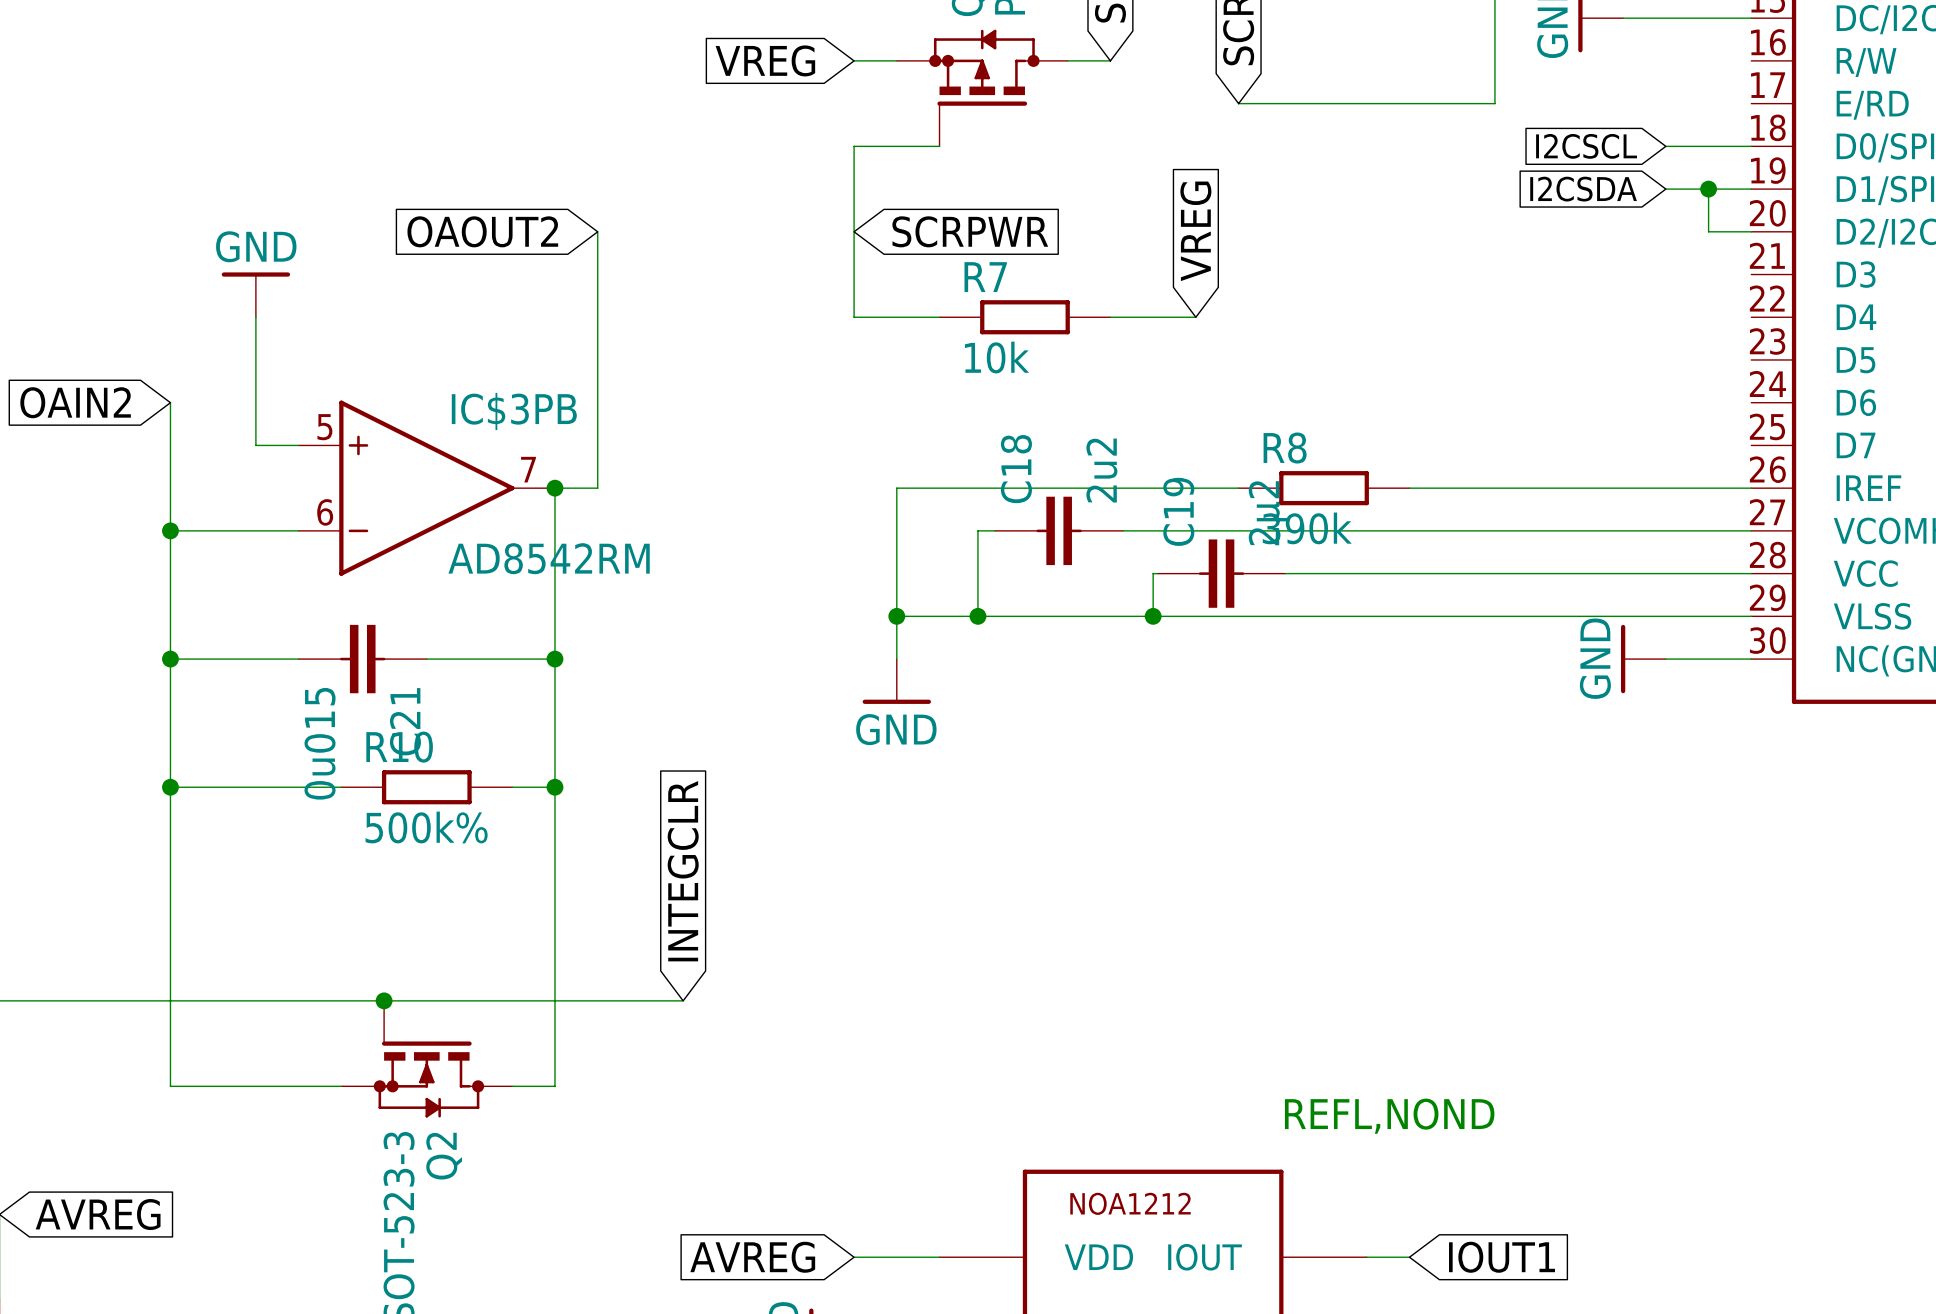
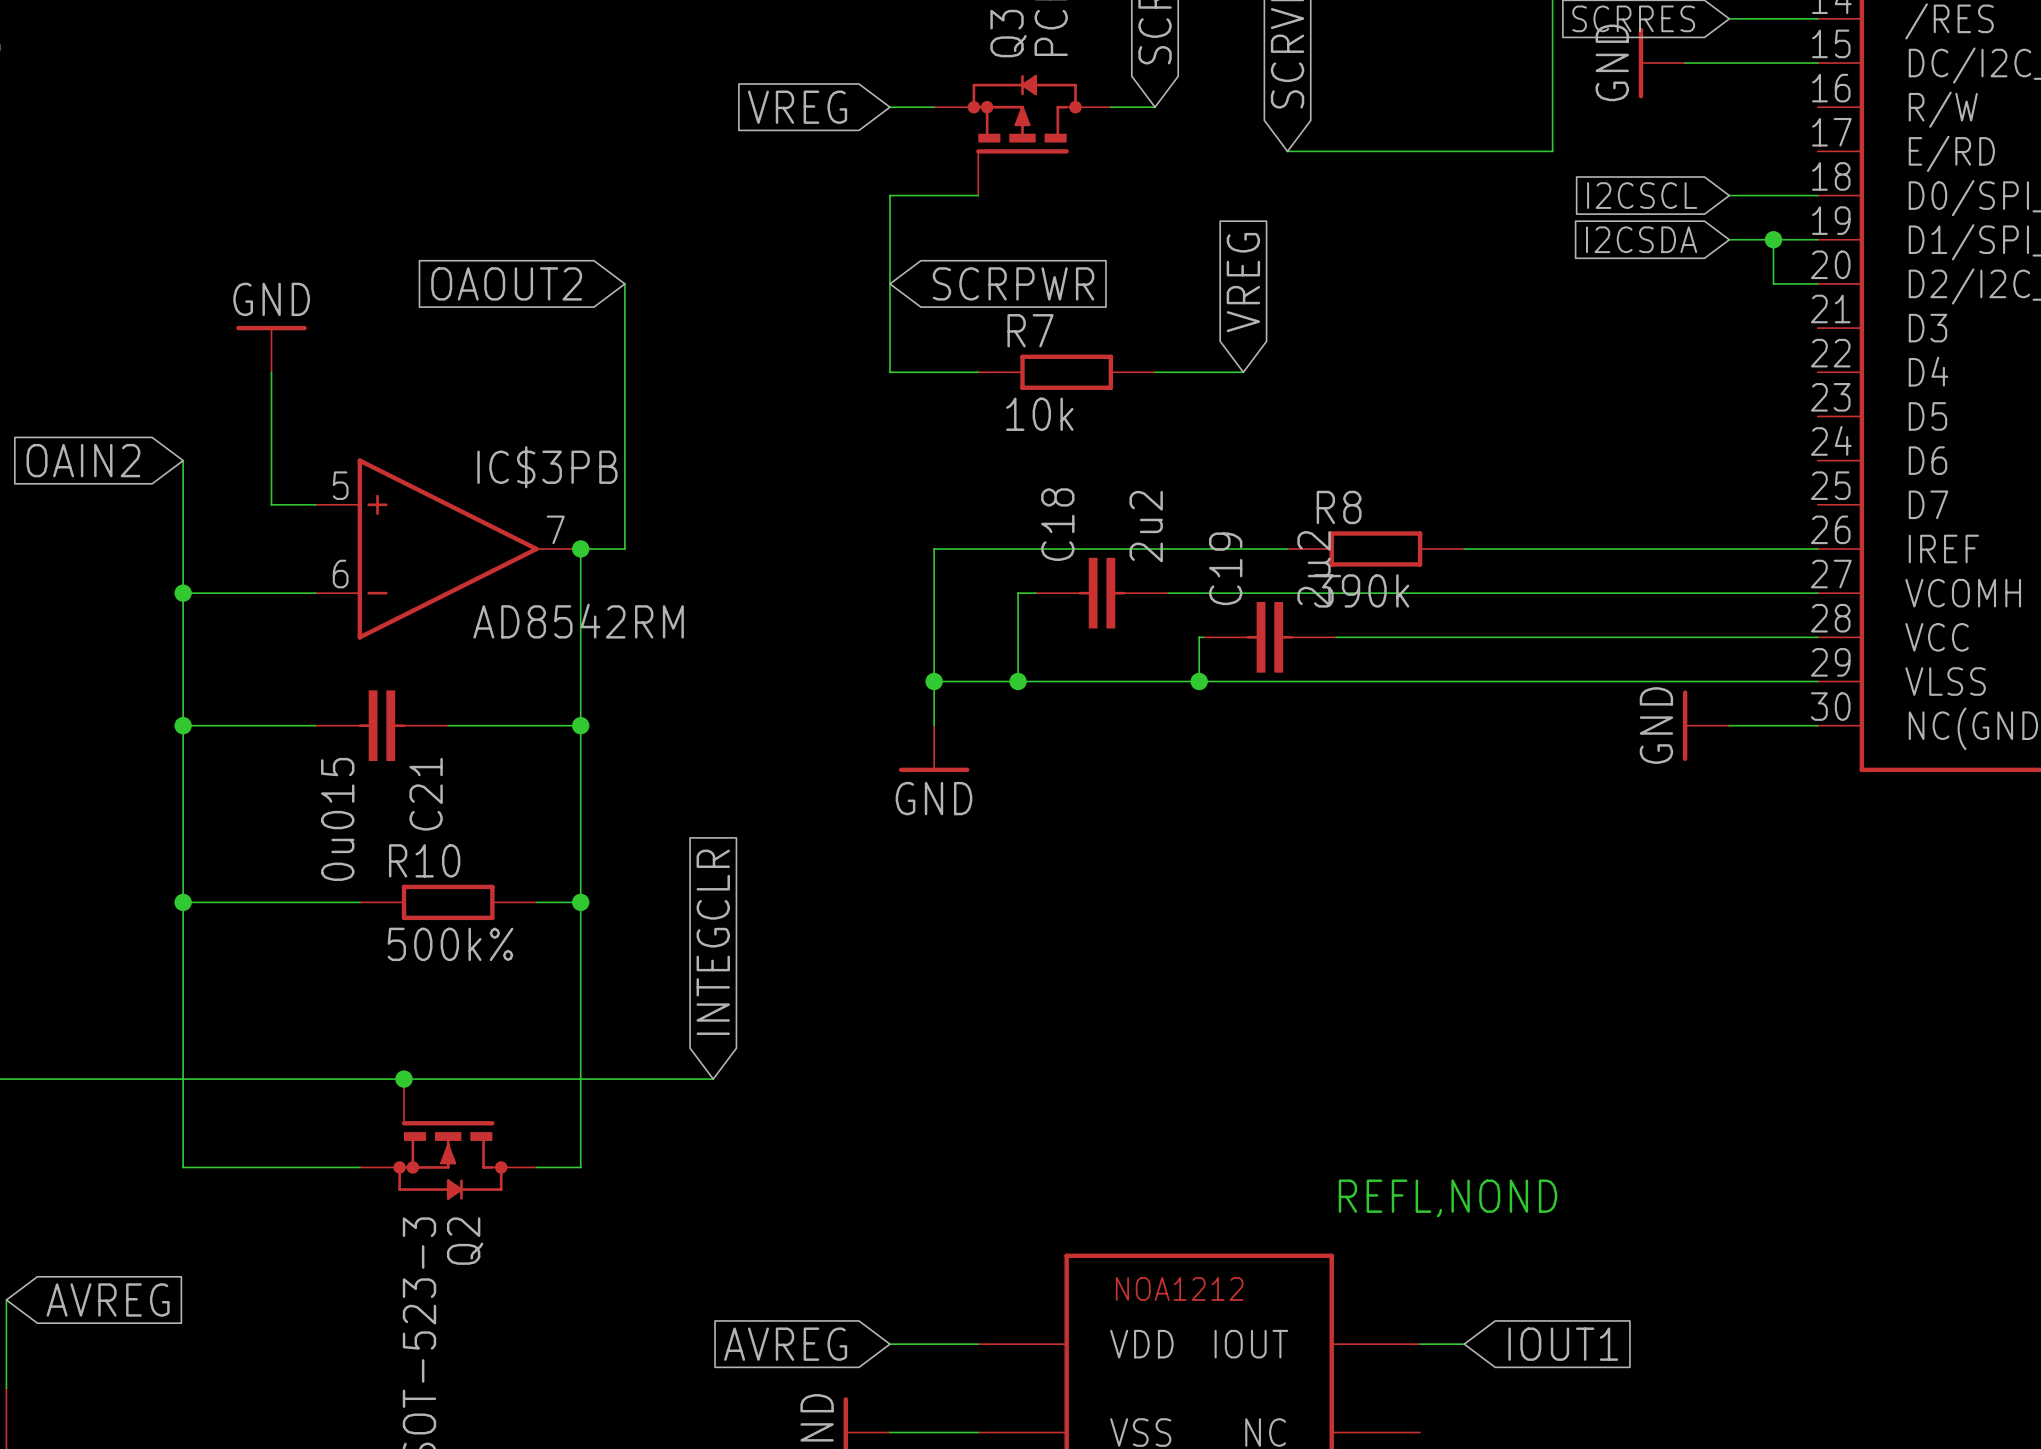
wire: (170, 787) (341, 787) -> (183, 902) (359, 902)
junction position: (170, 787) -> (183, 902)
R10 position: (426, 787) -> (448, 902)
wire: (512, 787) (554, 787) -> (536, 902) (580, 902)
junction position: (554, 787) -> (580, 902)

